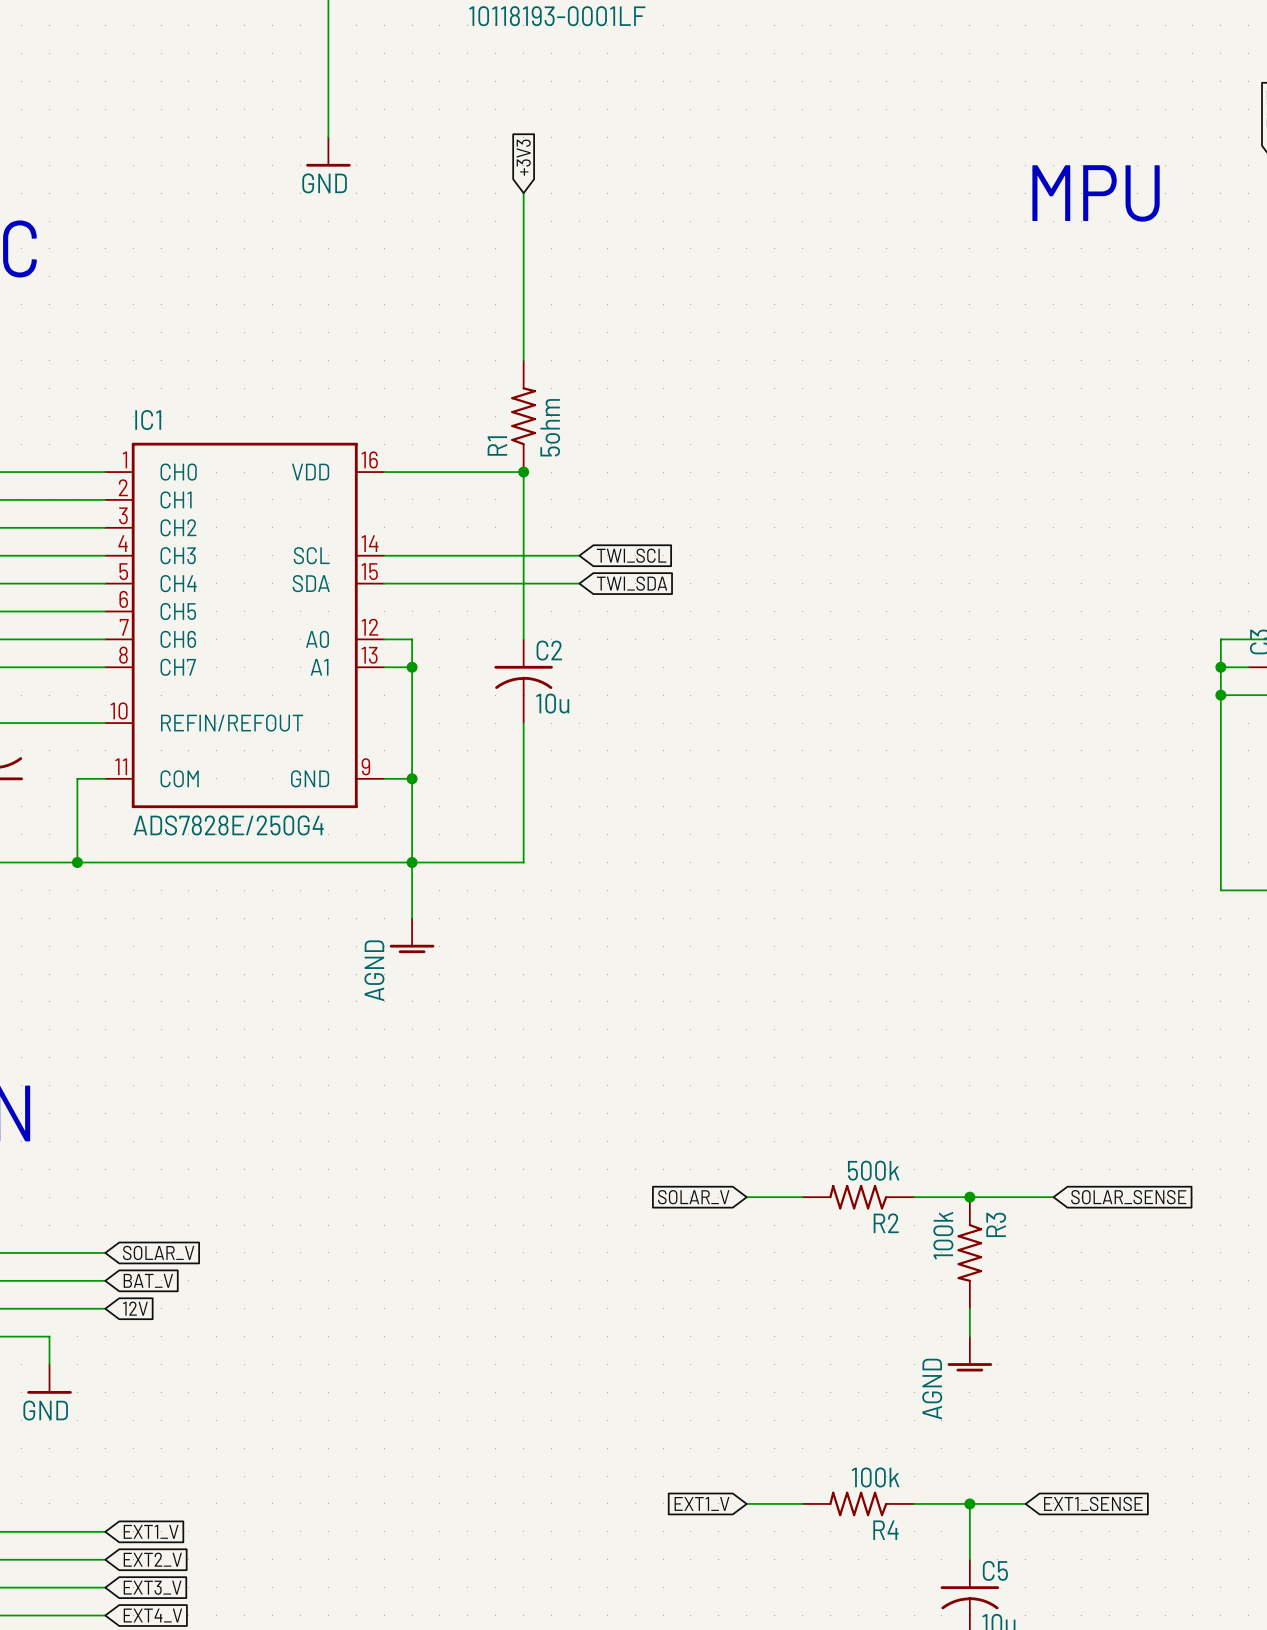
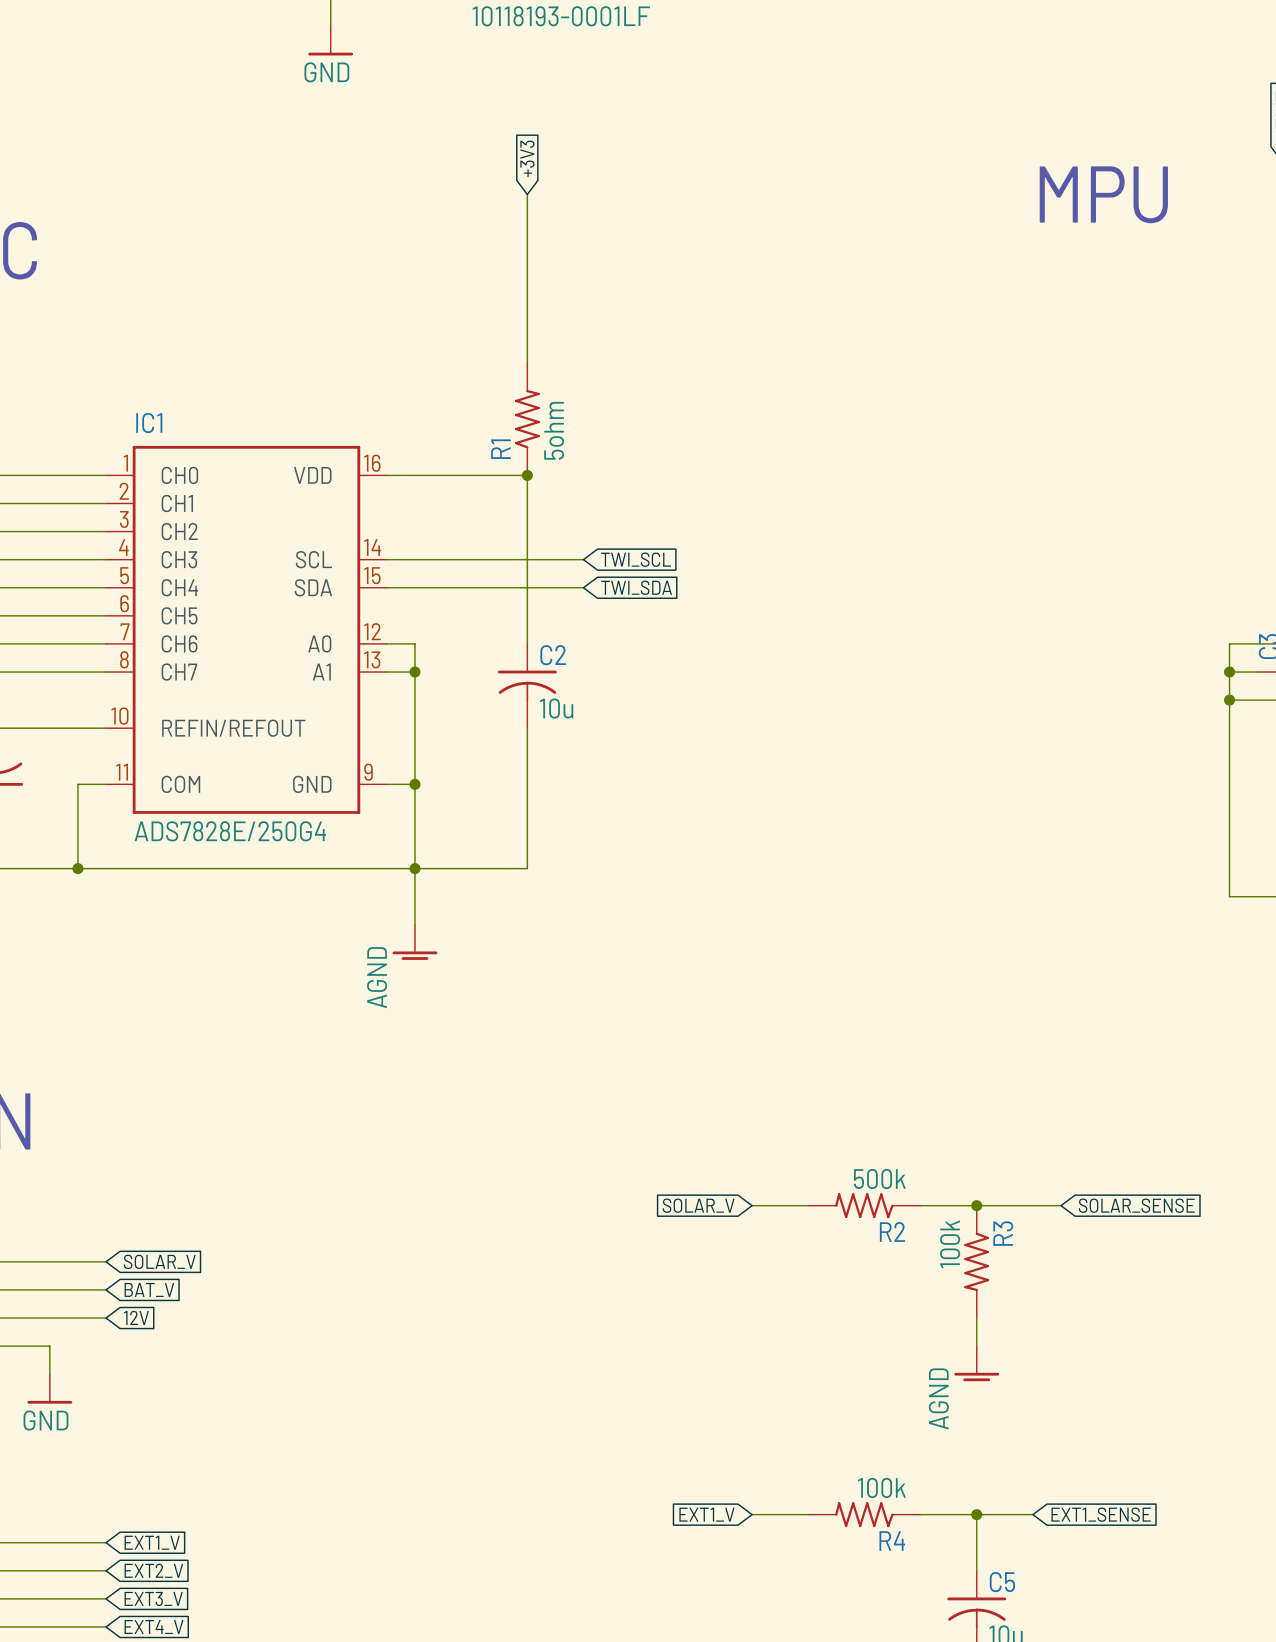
wire: (328, 25) (328, 137) -> none
power symbol position: GND (328, 152) -> GND (330, 40)

